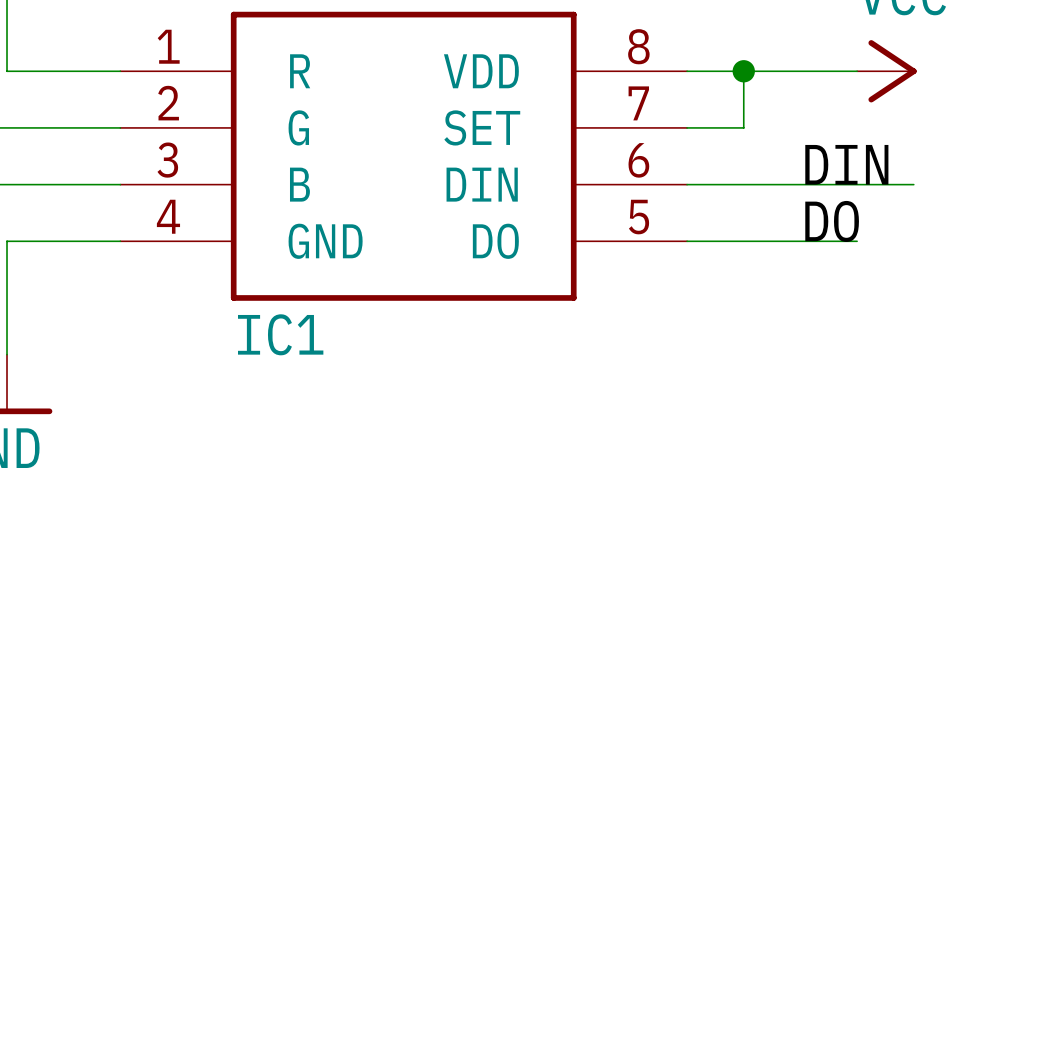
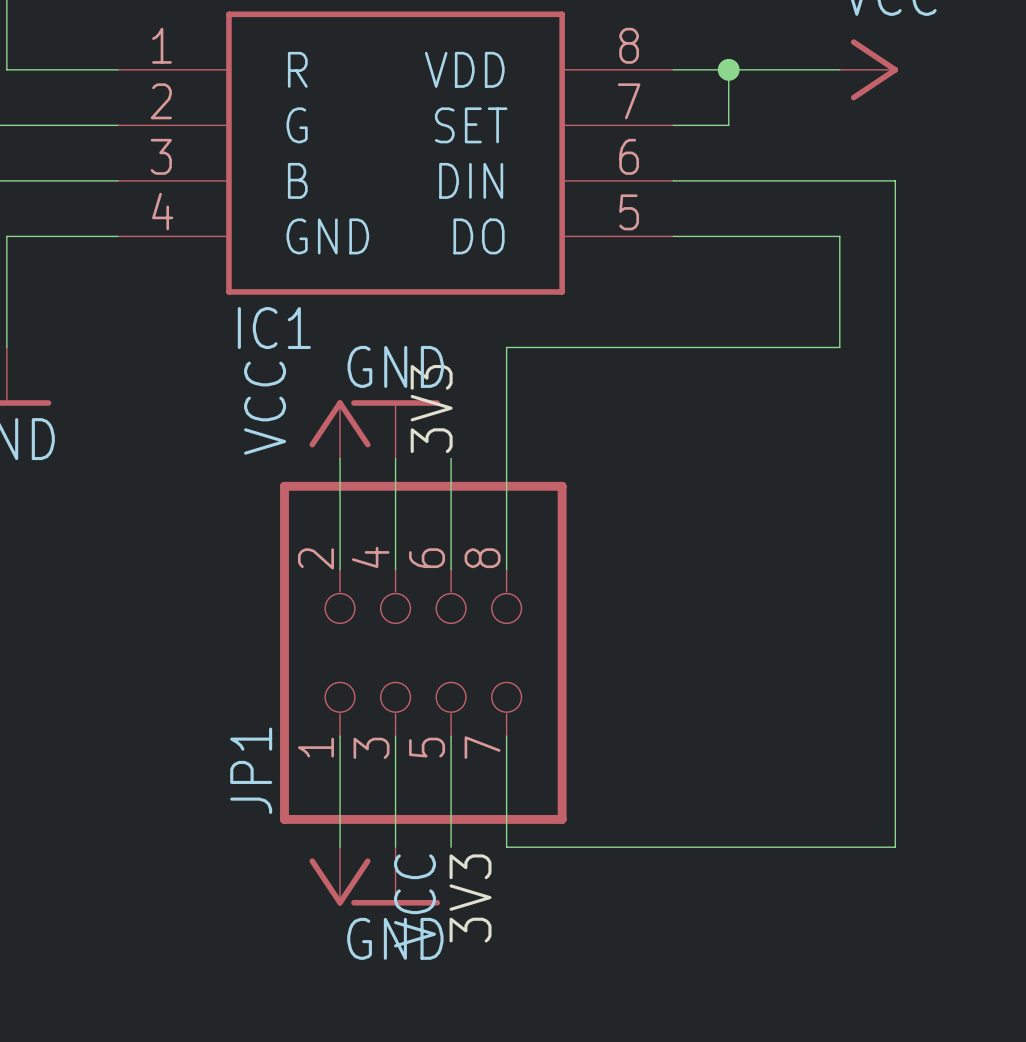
label: DIN (846, 164) -> none
wire: none -> (895, 180) (895, 847) (506, 847) (506, 736)
label: DO (832, 221) -> none
wire: none -> (839, 236) (839, 347) (506, 347) (506, 569)
label: none -> 3V3 (431, 409)
power symbol: none -> VCC (340, 429)
power symbol: none -> GND (395, 429)
wire: none -> (340, 458) (340, 569)
wire: none -> (395, 458) (395, 569)
wire: none -> (451, 458) (451, 569)
JP1: none -> (423, 652)
wire: none -> (340, 736) (340, 847)
wire: none -> (395, 736) (395, 847)
wire: none -> (451, 736) (451, 847)
power symbol: none -> VCC (340, 876)
power symbol: none -> GND (395, 876)
label: none -> 3V3 (470, 898)

